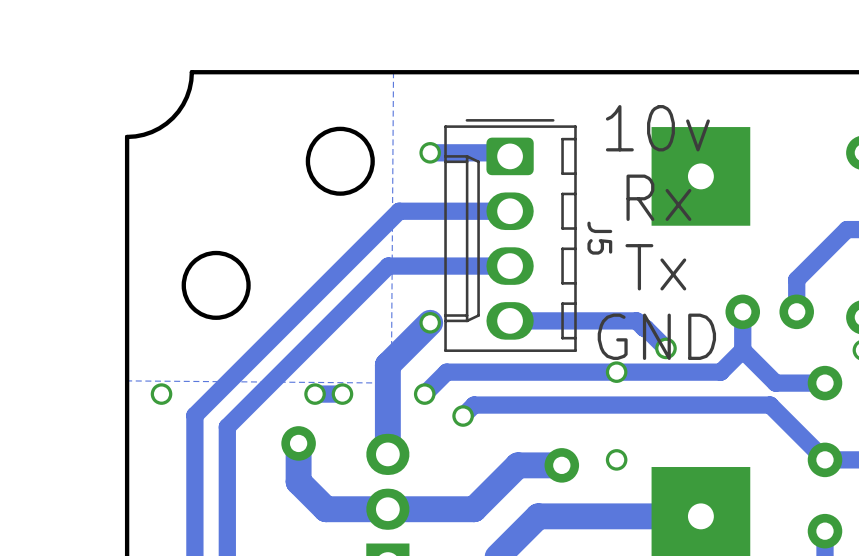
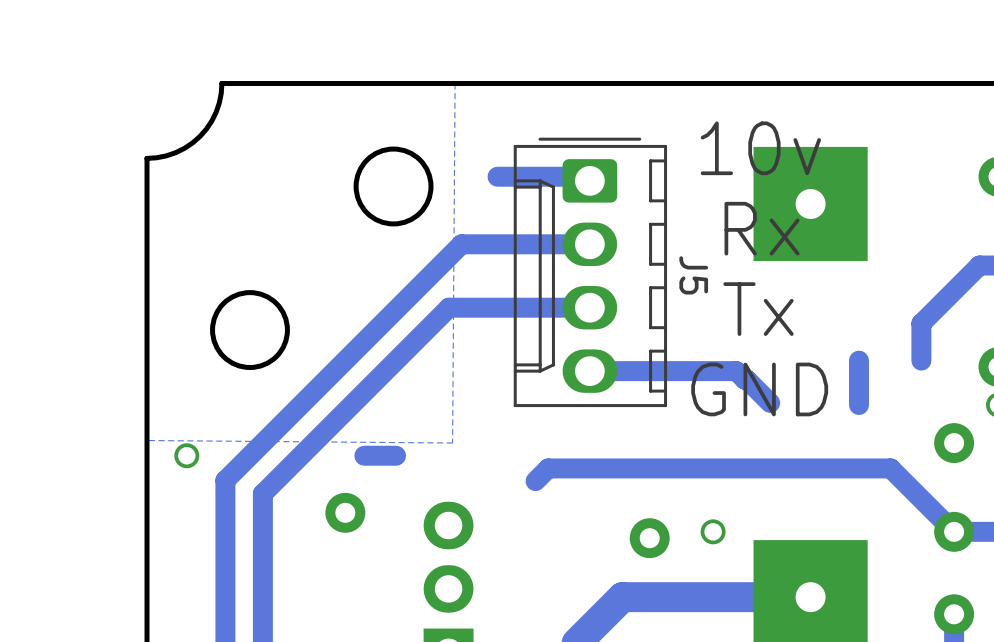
via: (430, 152) -> none
part: (769, 311) -> none
track: (430, 322) (387, 365) (387, 454) -> none
via: (430, 322) -> none
via: (665, 348) -> none
via: (616, 372) -> none
track: (825, 383) (775, 383) (742, 350) (720, 372) (446, 372) (424, 394) -> none
via: (315, 394) -> none
via: (342, 394) -> none
via: (424, 394) -> none
via: (463, 416) -> none
track: (298, 443) (298, 481) (326, 509) (474, 509) (517, 465) (561, 465) -> none

